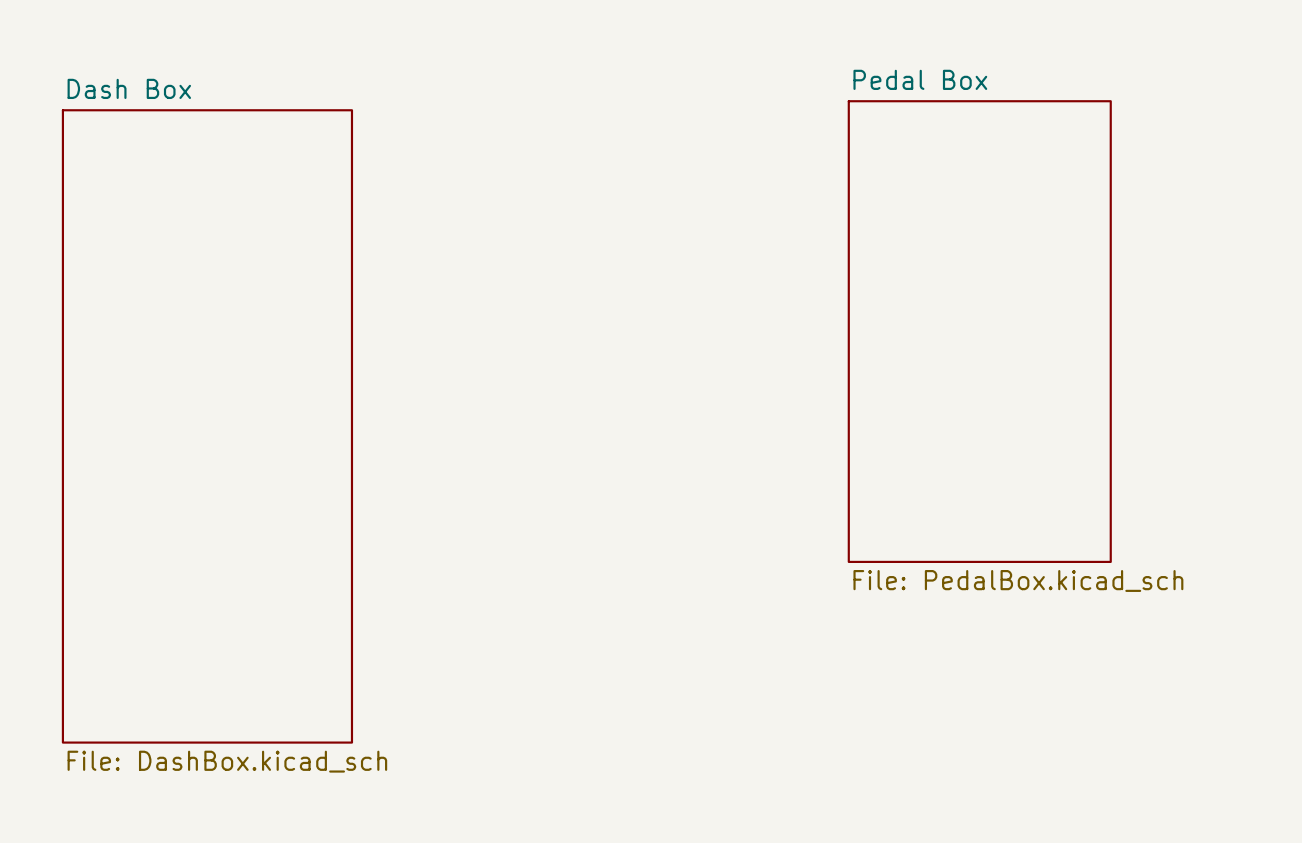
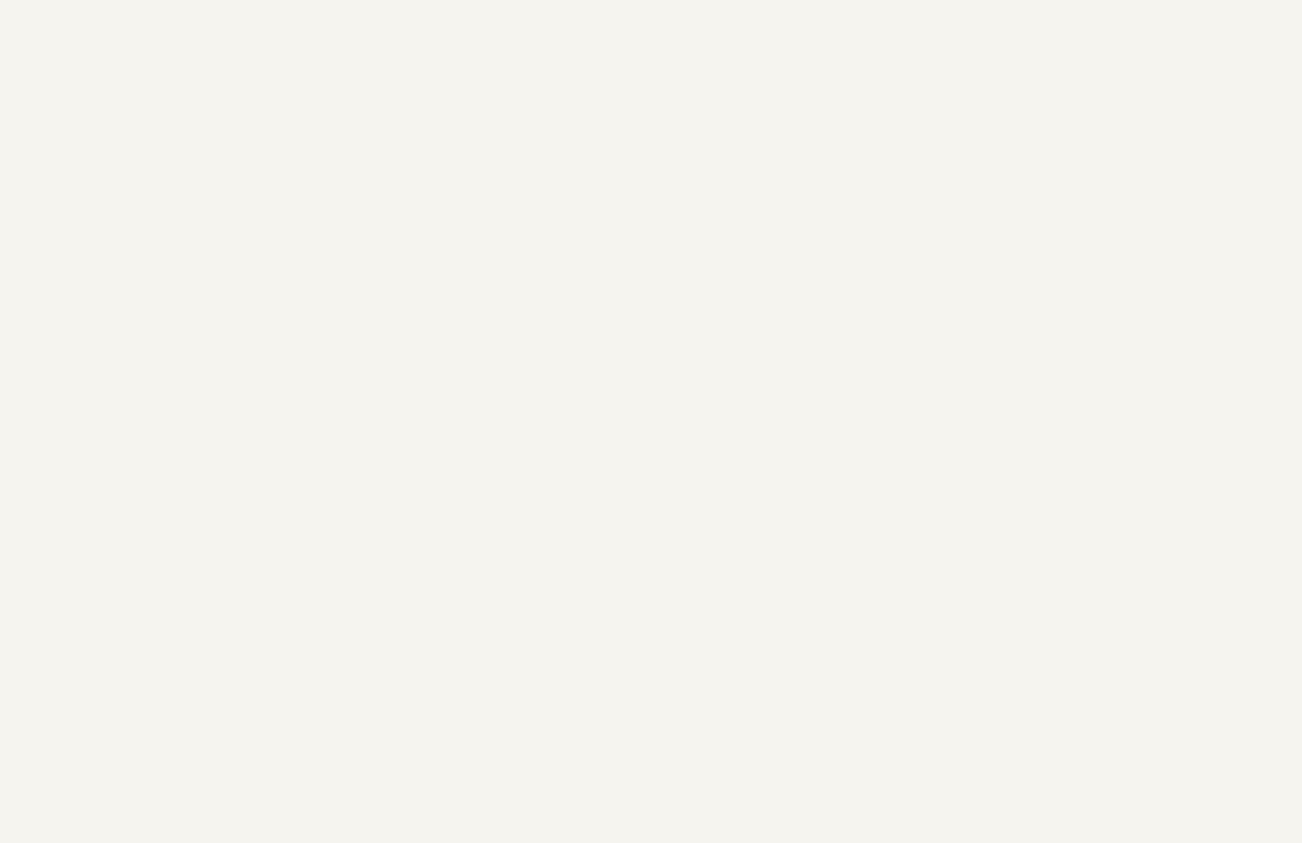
sheet Pedal Box: File: PedalBox.kicad_sch (979, 331) -> none
sheet Dash Box: File: DashBox.kicad_sch (207, 426) -> none

